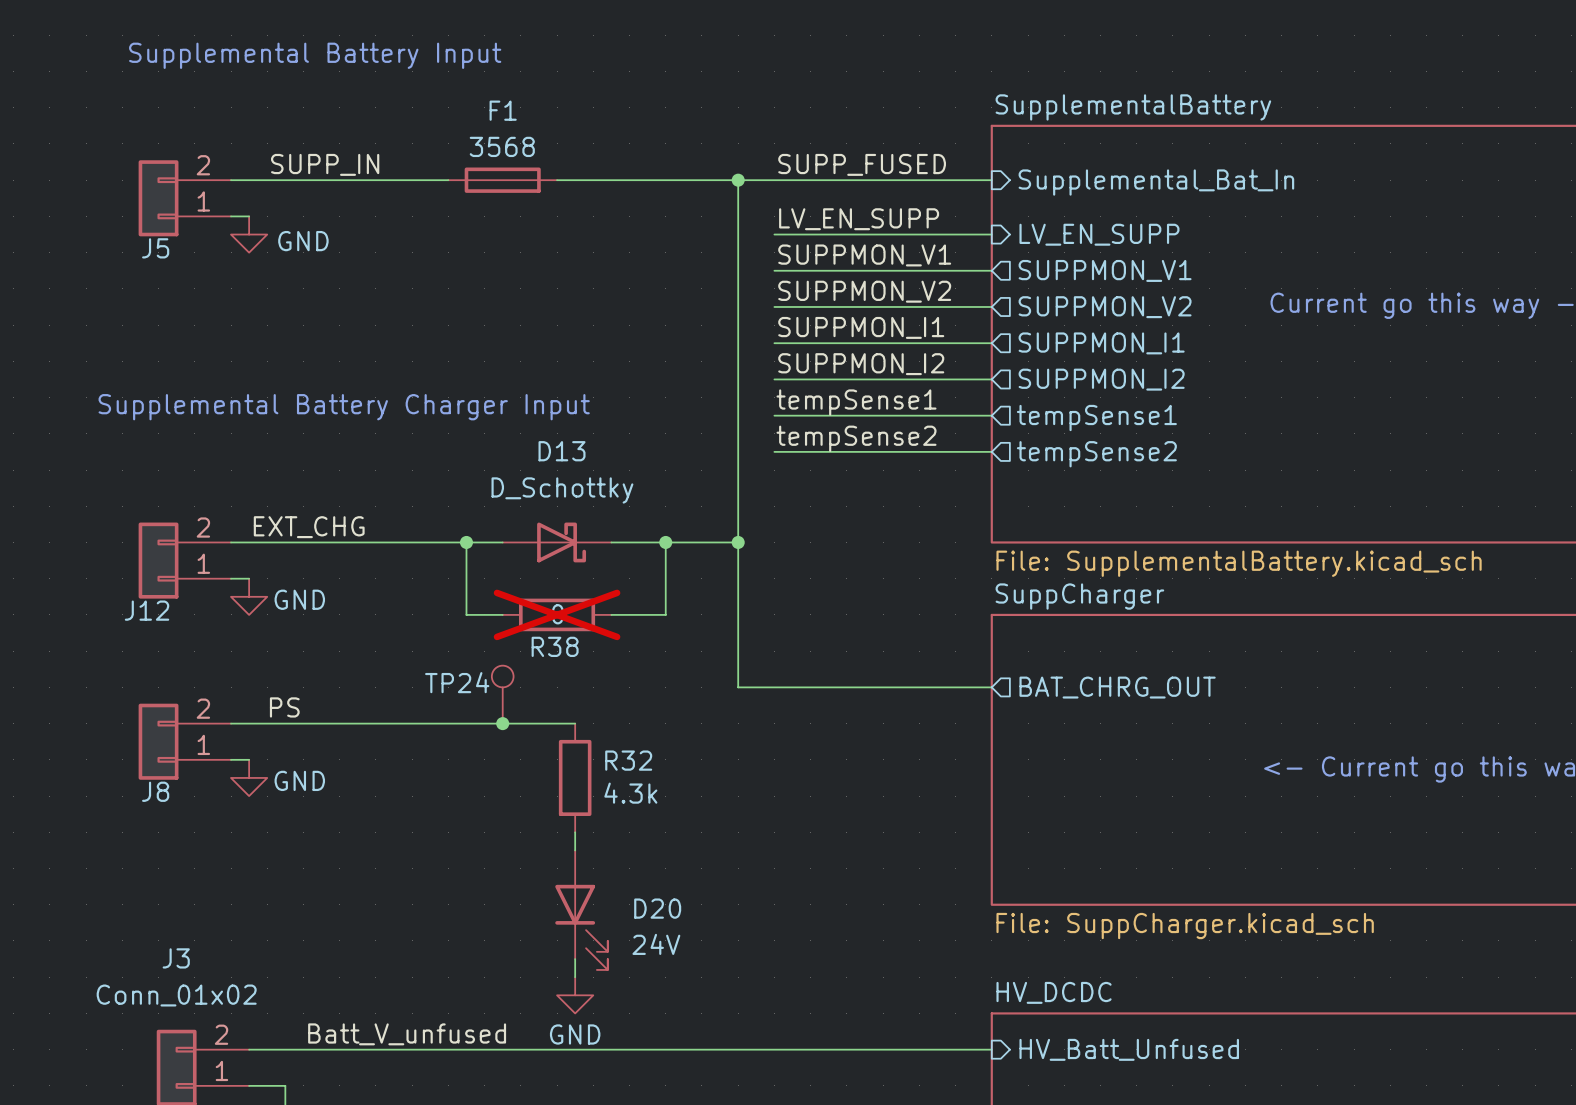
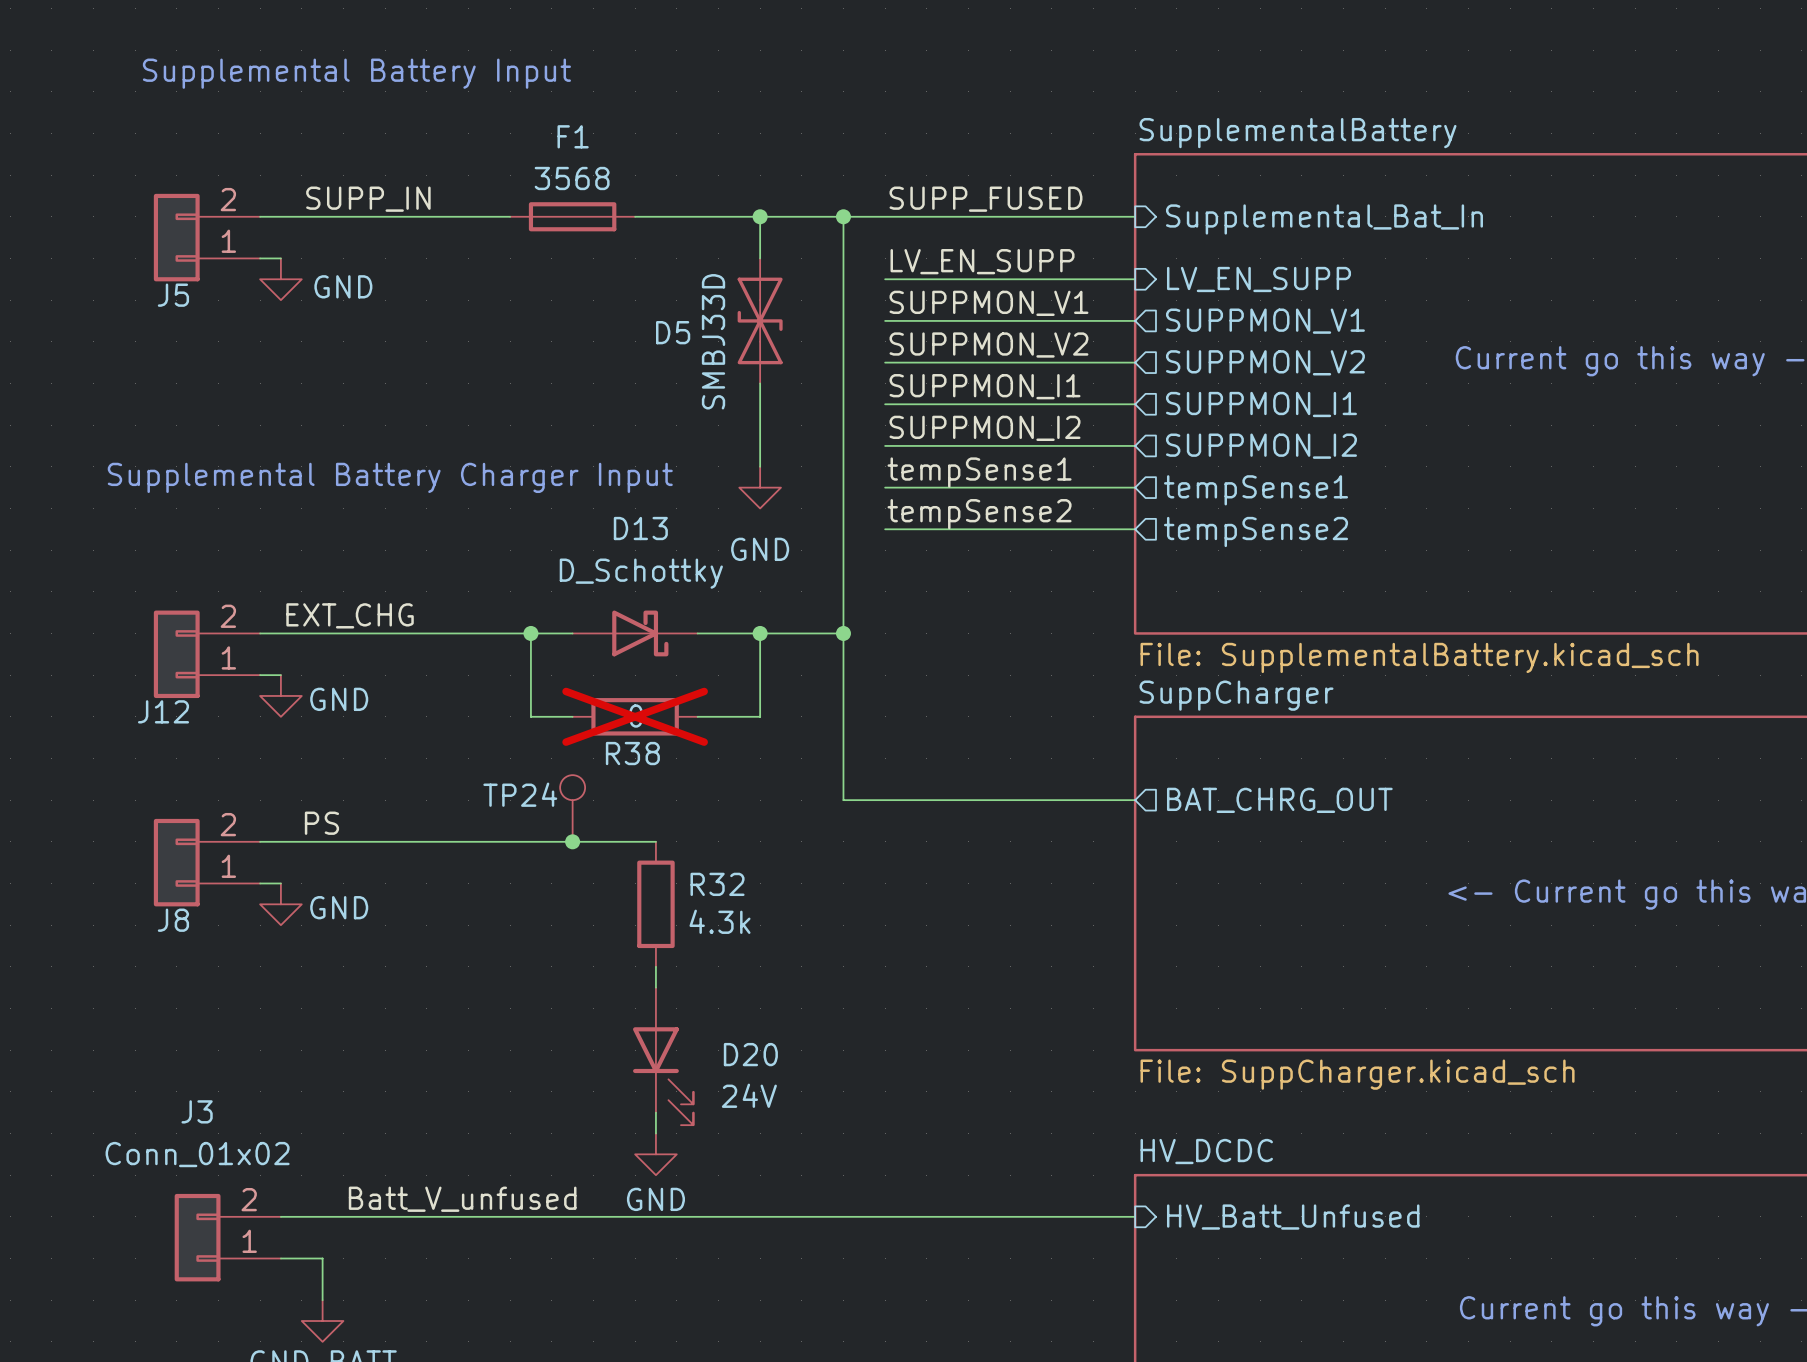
wire: none -> (760, 216) (760, 258)
junction: none -> (760, 216)
D5: none -> SMBJ33D (760, 320)
wire: none -> (760, 383) (760, 466)
power symbol: none -> GND (760, 487)

